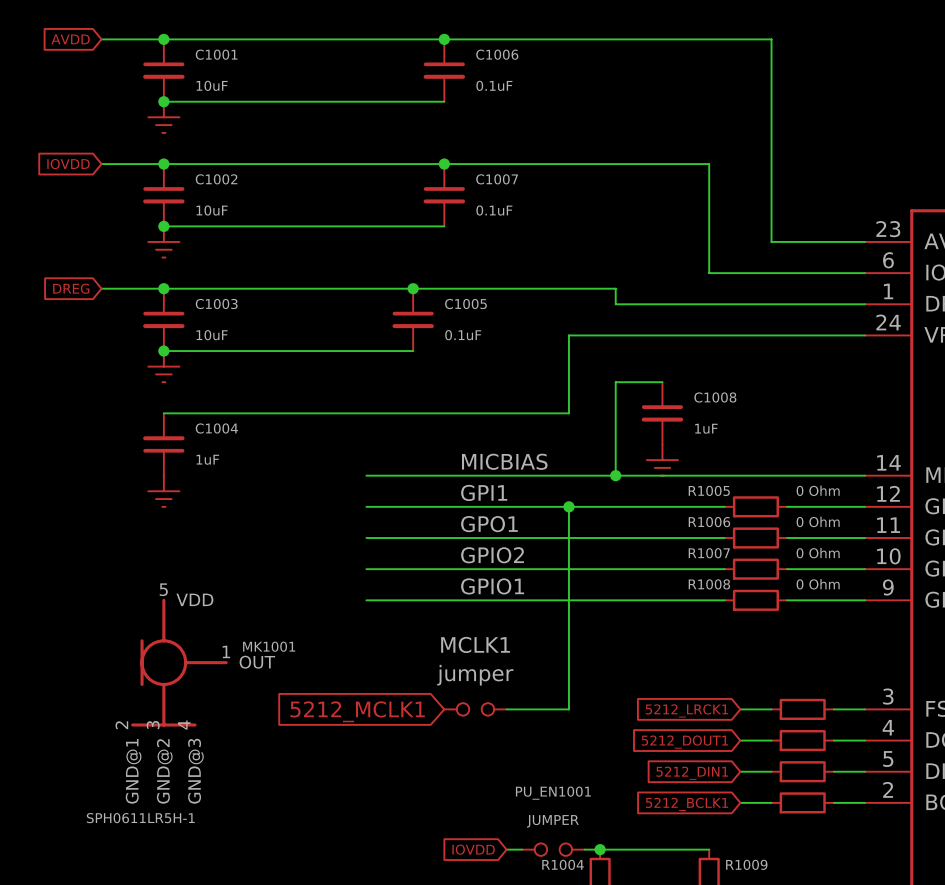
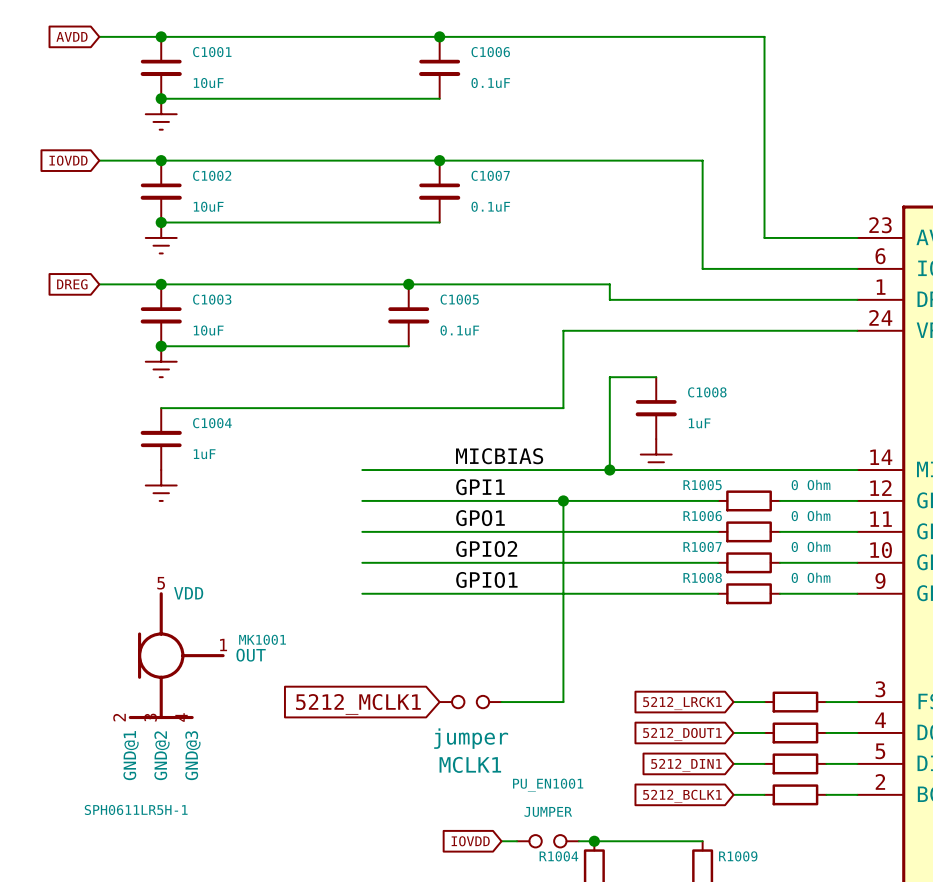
MCLK1 name position: MCLK1 (475, 644) -> MCLK1 (470, 764)
MCLK1 value position: jumper (475, 675) -> jumper (471, 738)

